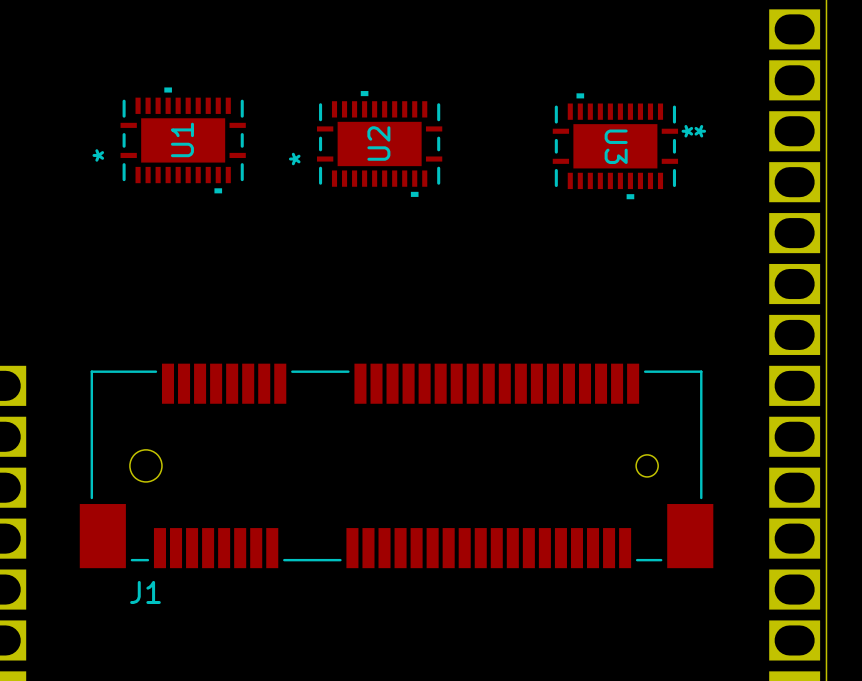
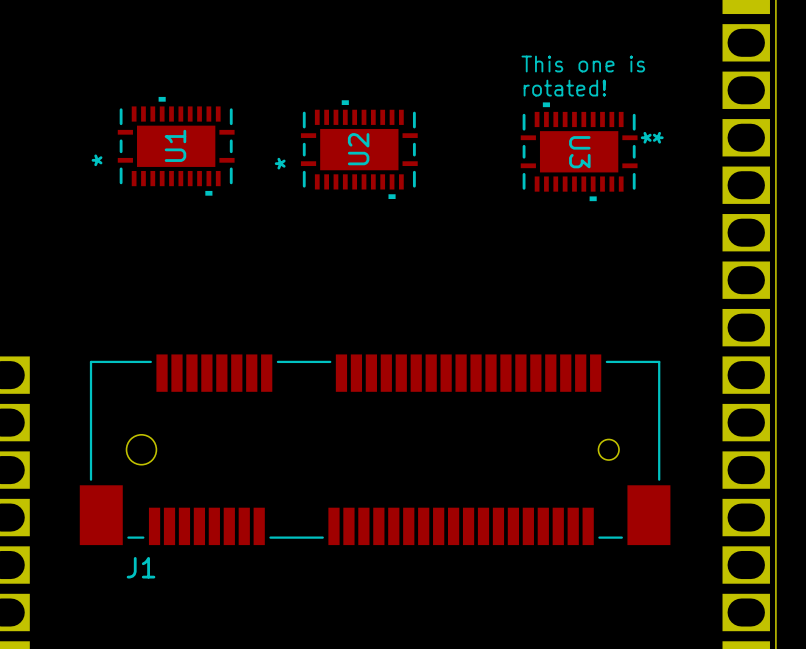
text: none -> This one is (583, 64)
text: none -> rotated! (564, 88)

